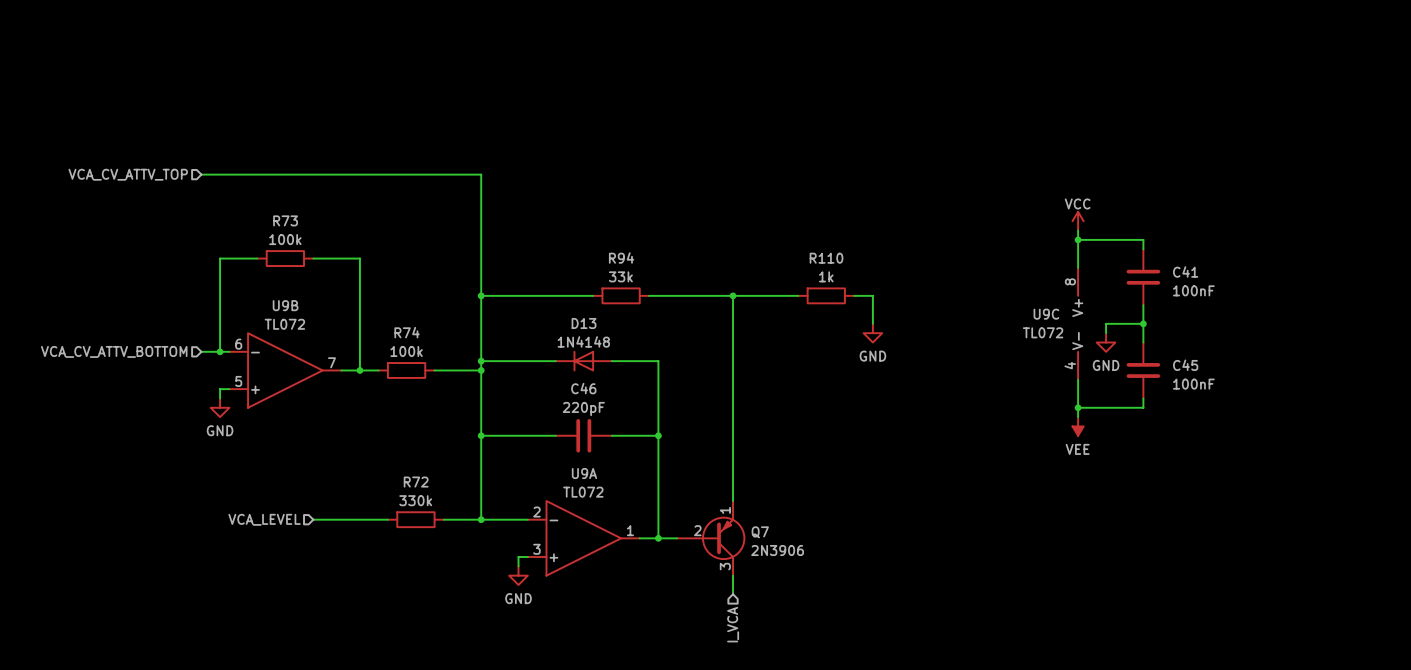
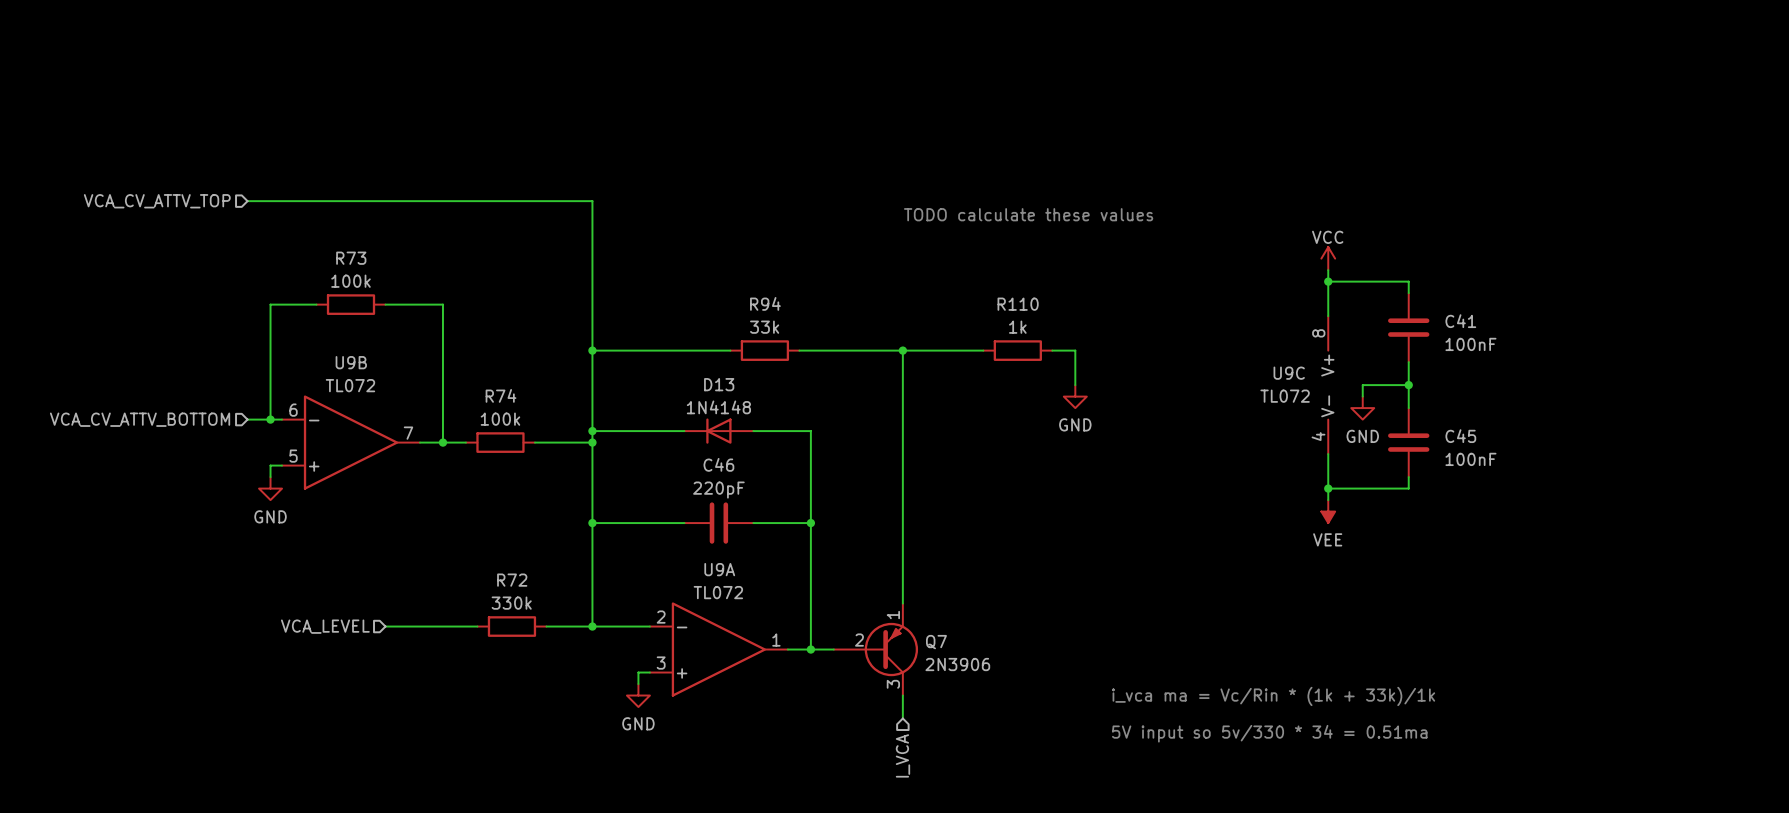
text: none -> TODO calculate these values (1028, 214)
text: none -> i_vca ma = Vc/Rin * (1k + 33k)/1k (1273, 696)
text: none -> 5V input so 5v/330 * 34 = 0.51ma (1269, 733)

